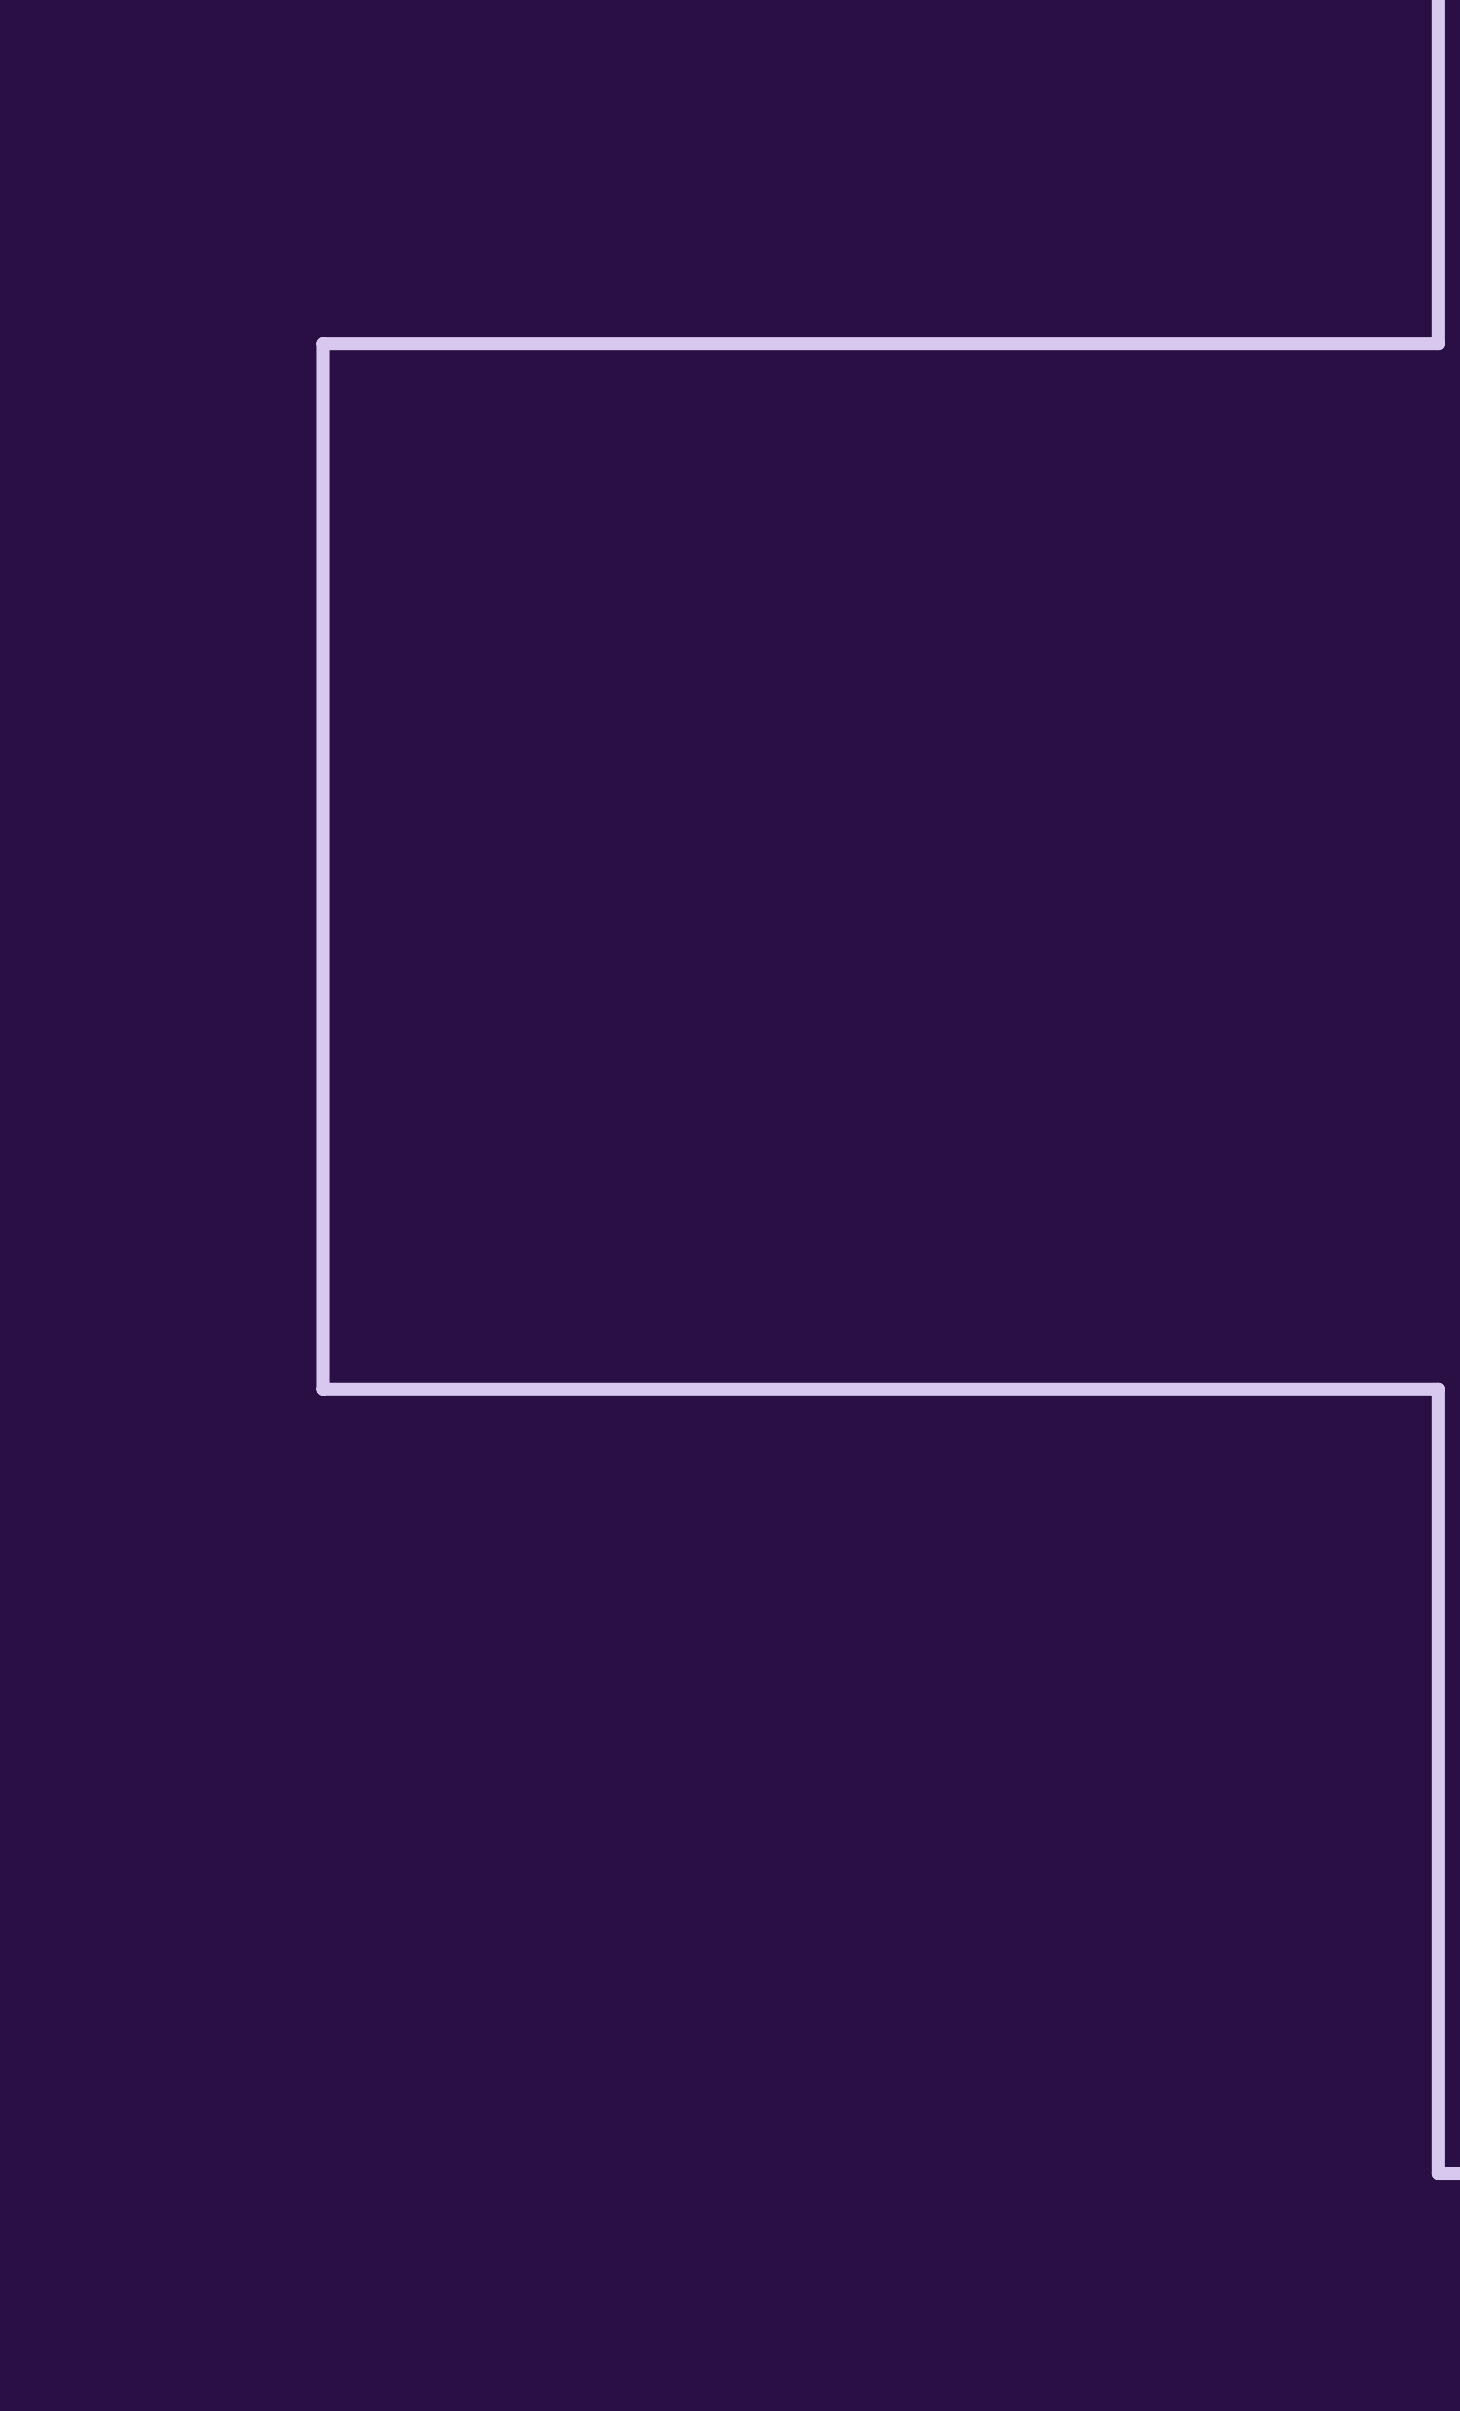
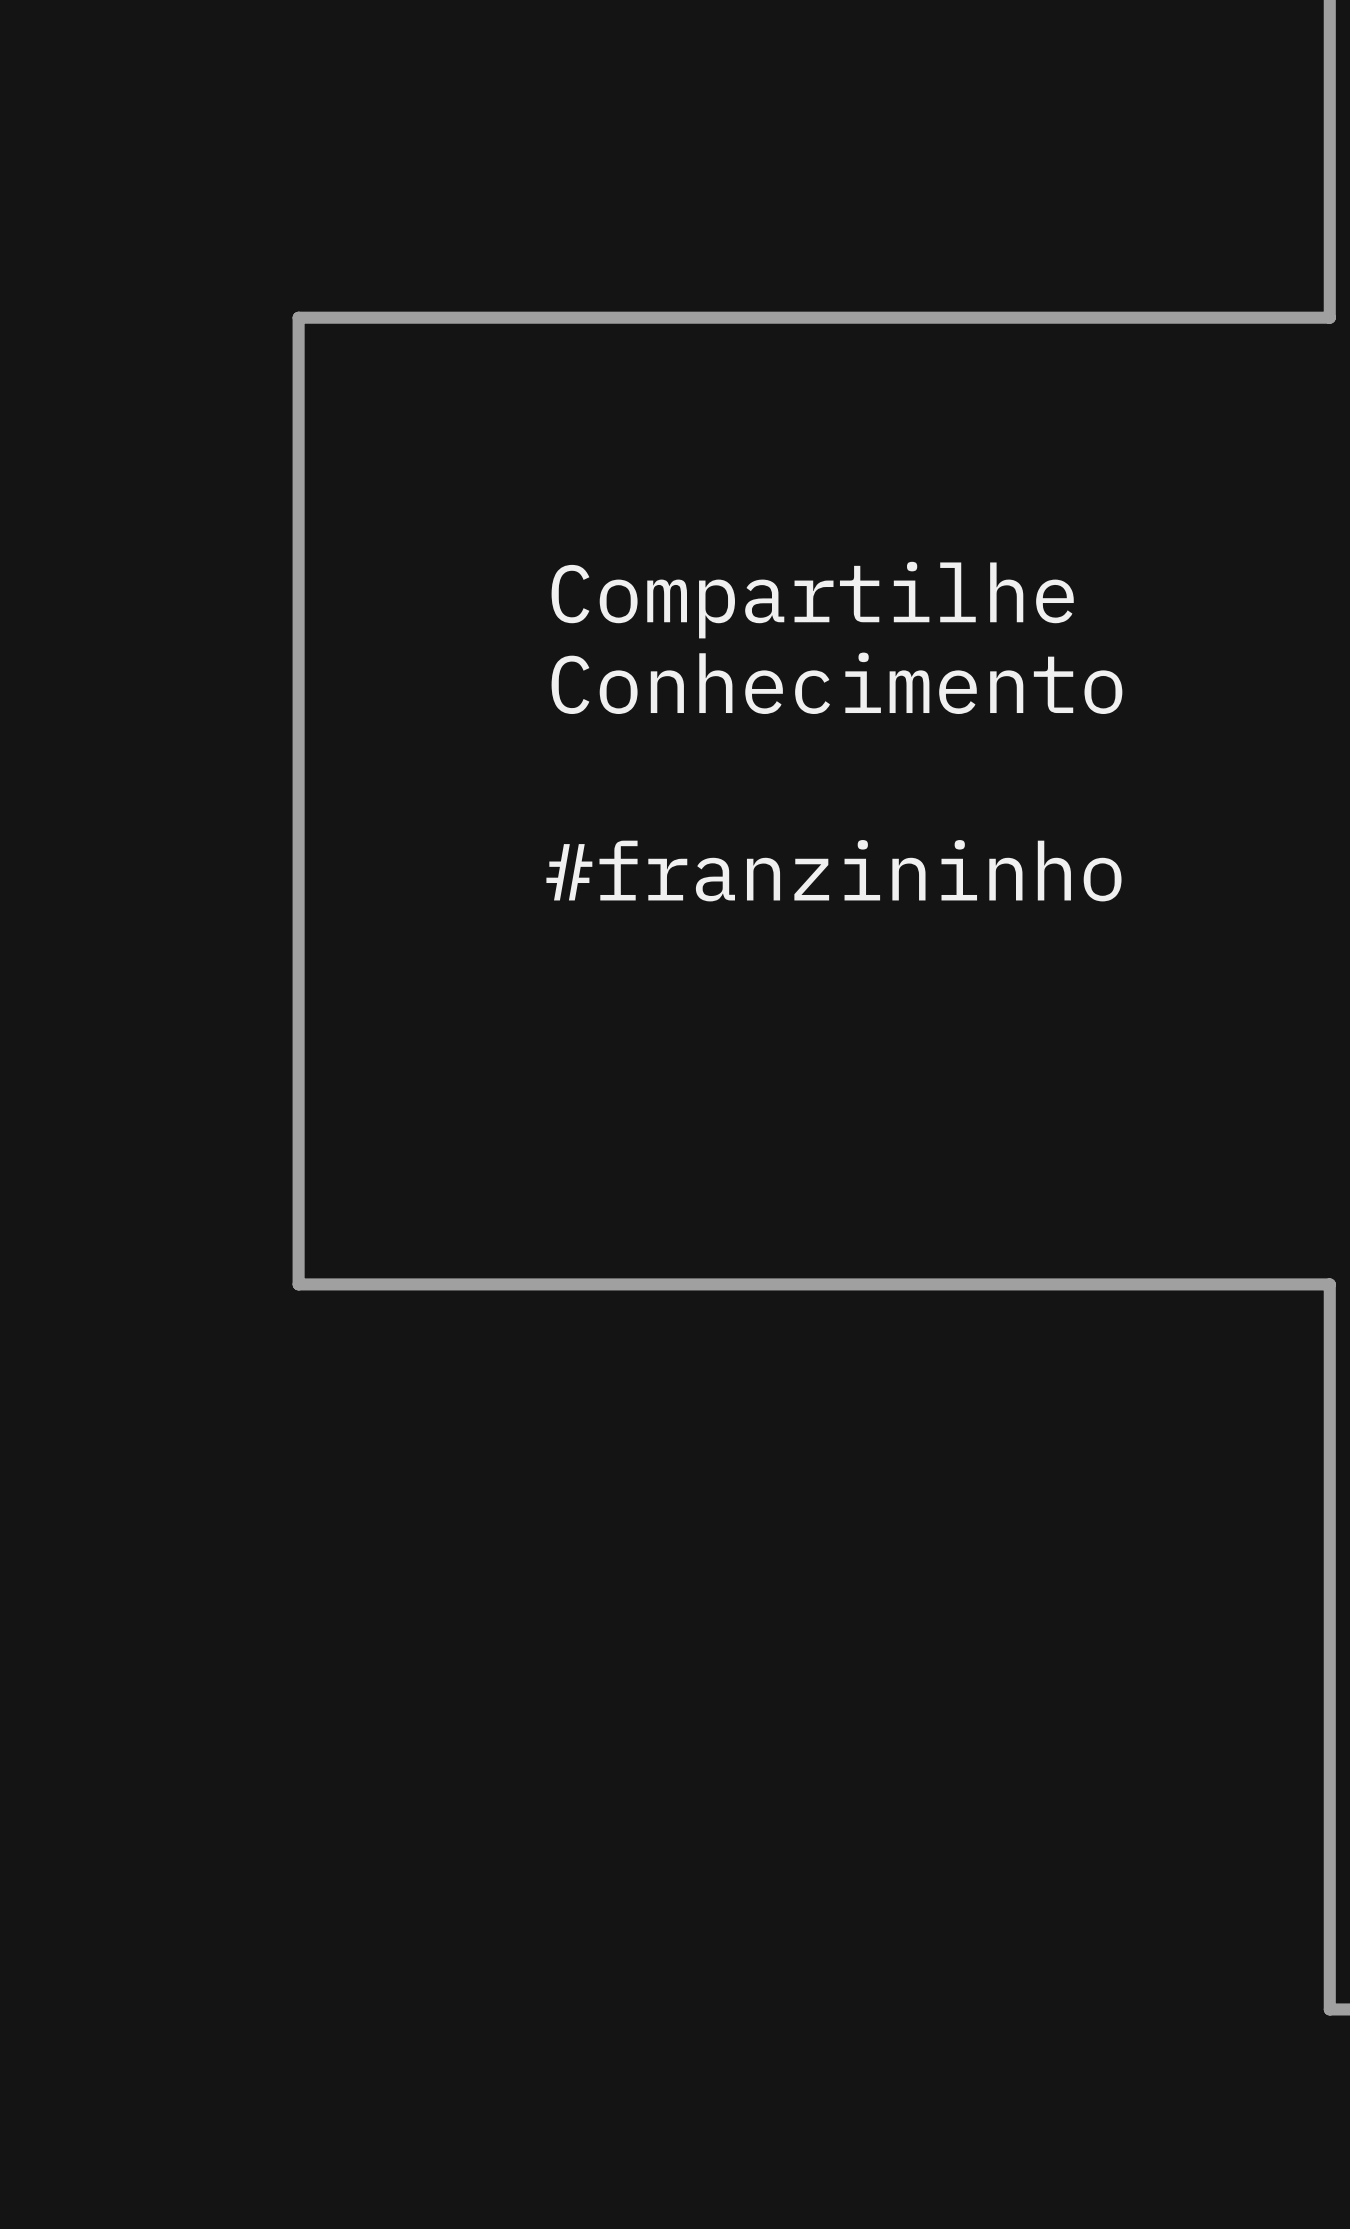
text: none -> Compartilhe (812, 600)
text: none -> Conhecimento (836, 683)
text: none -> #franzininho (833, 870)

